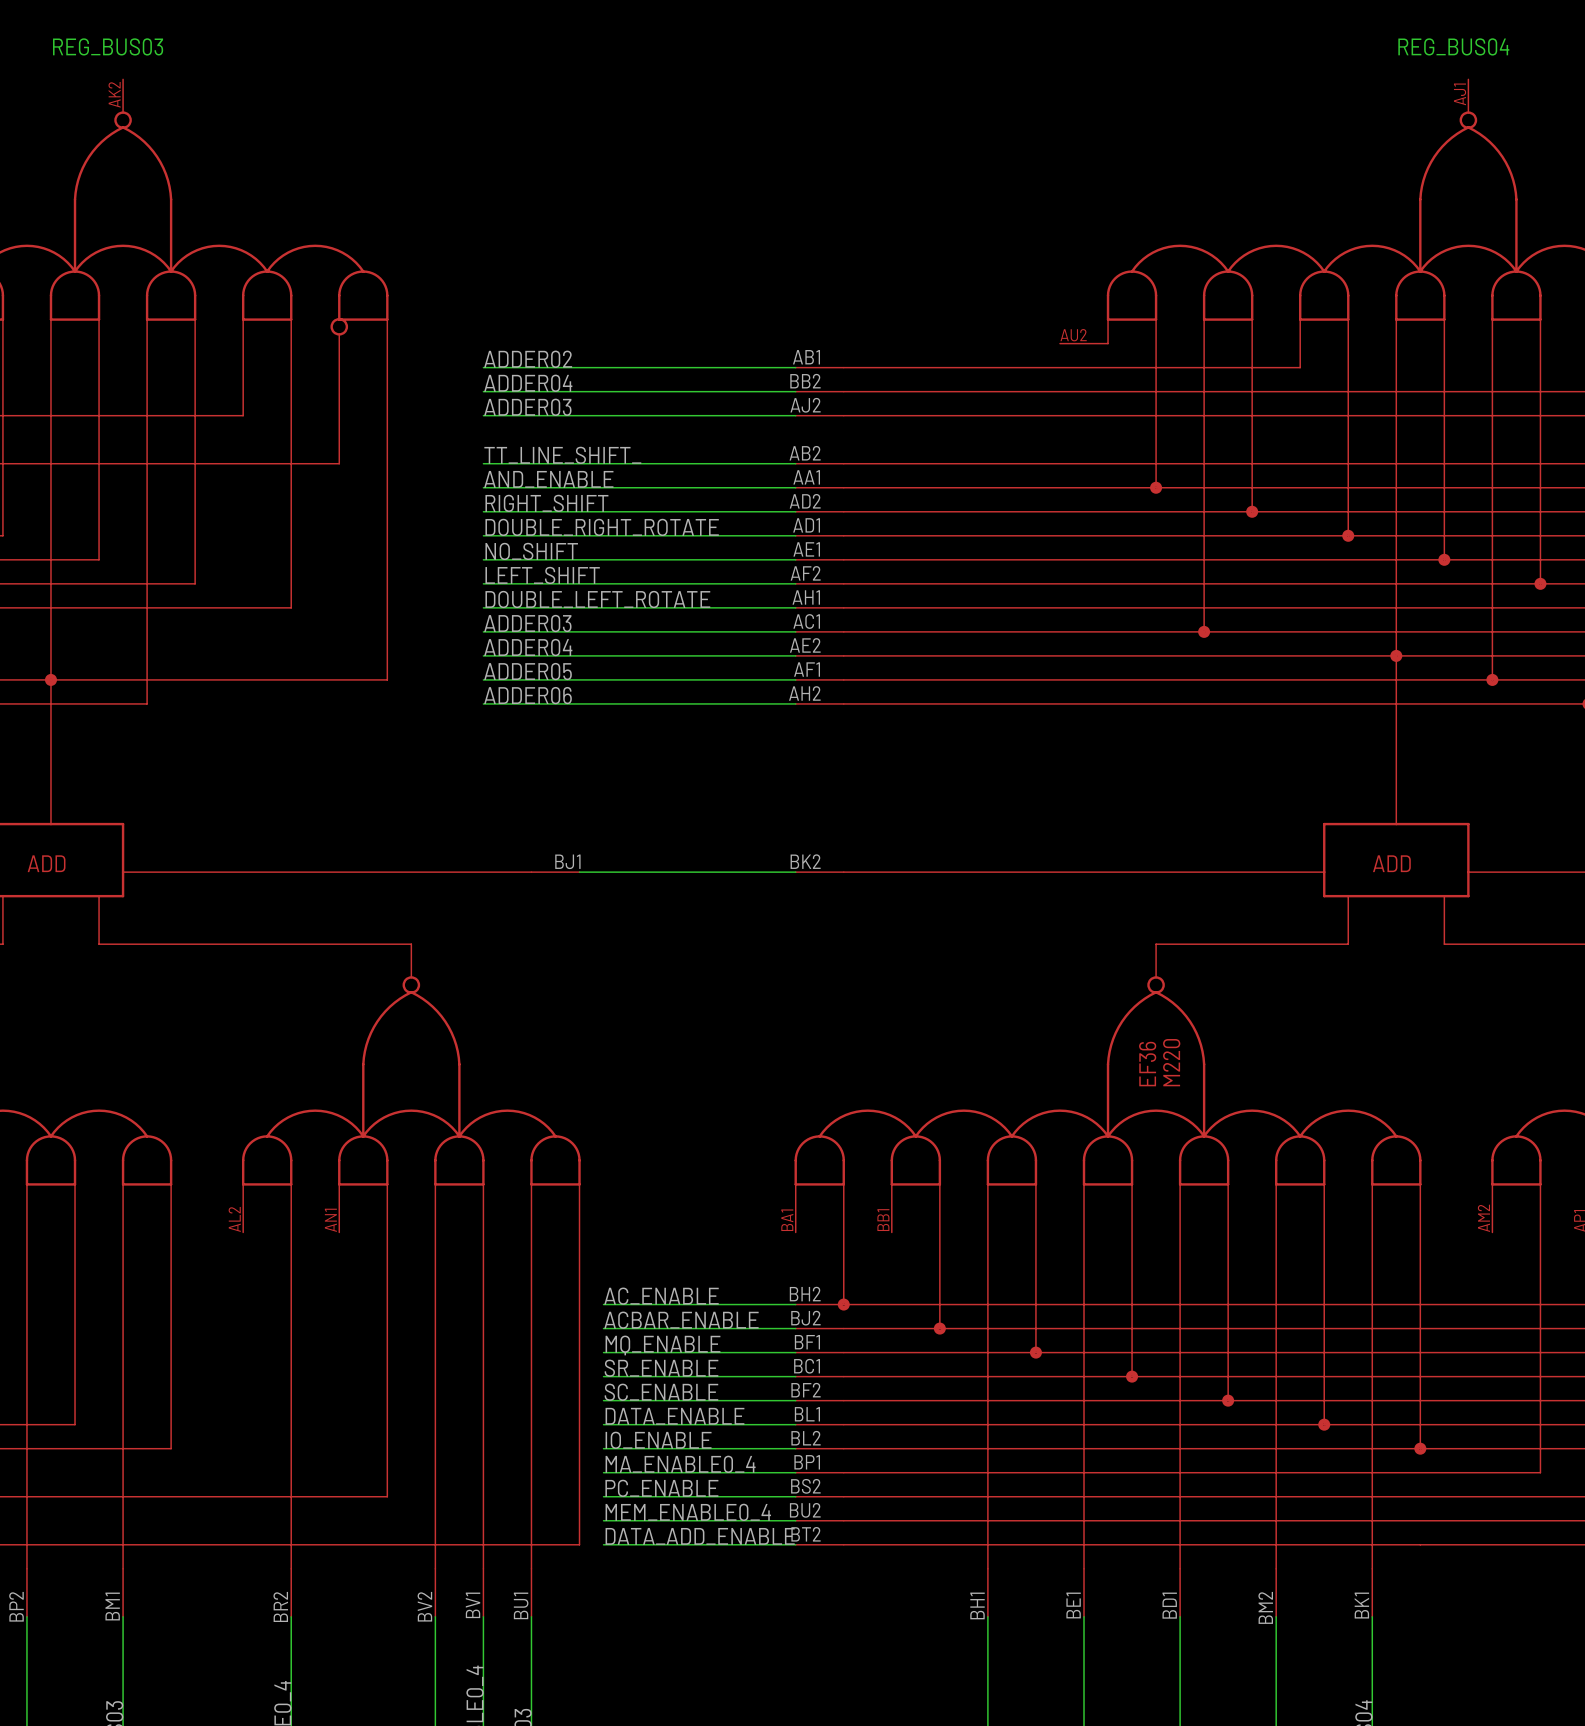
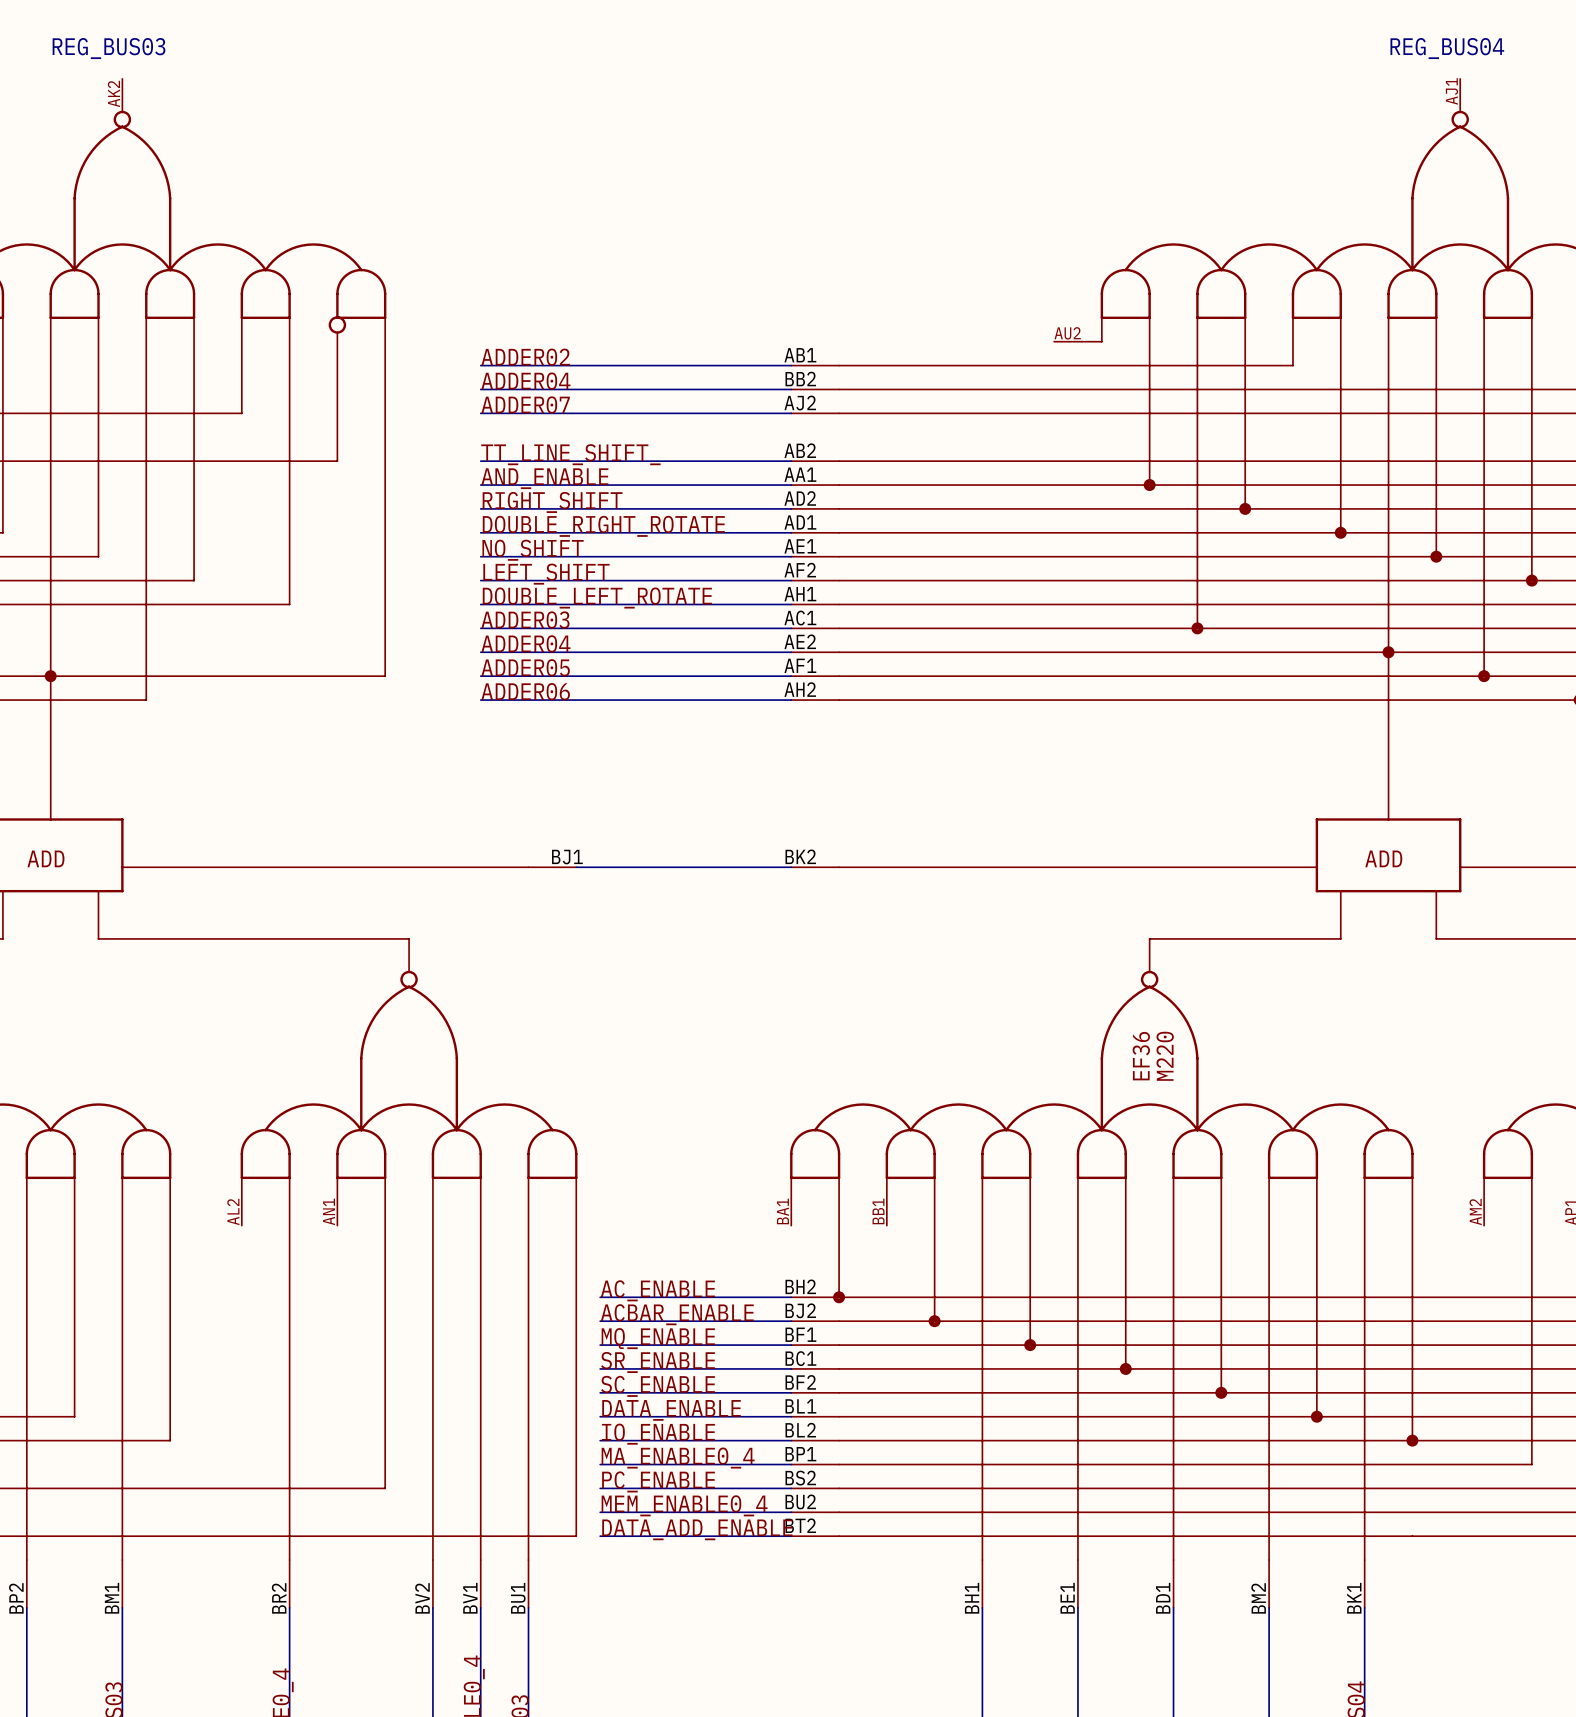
label: ADDER03 (527, 407) -> ADDER07 (525, 405)

